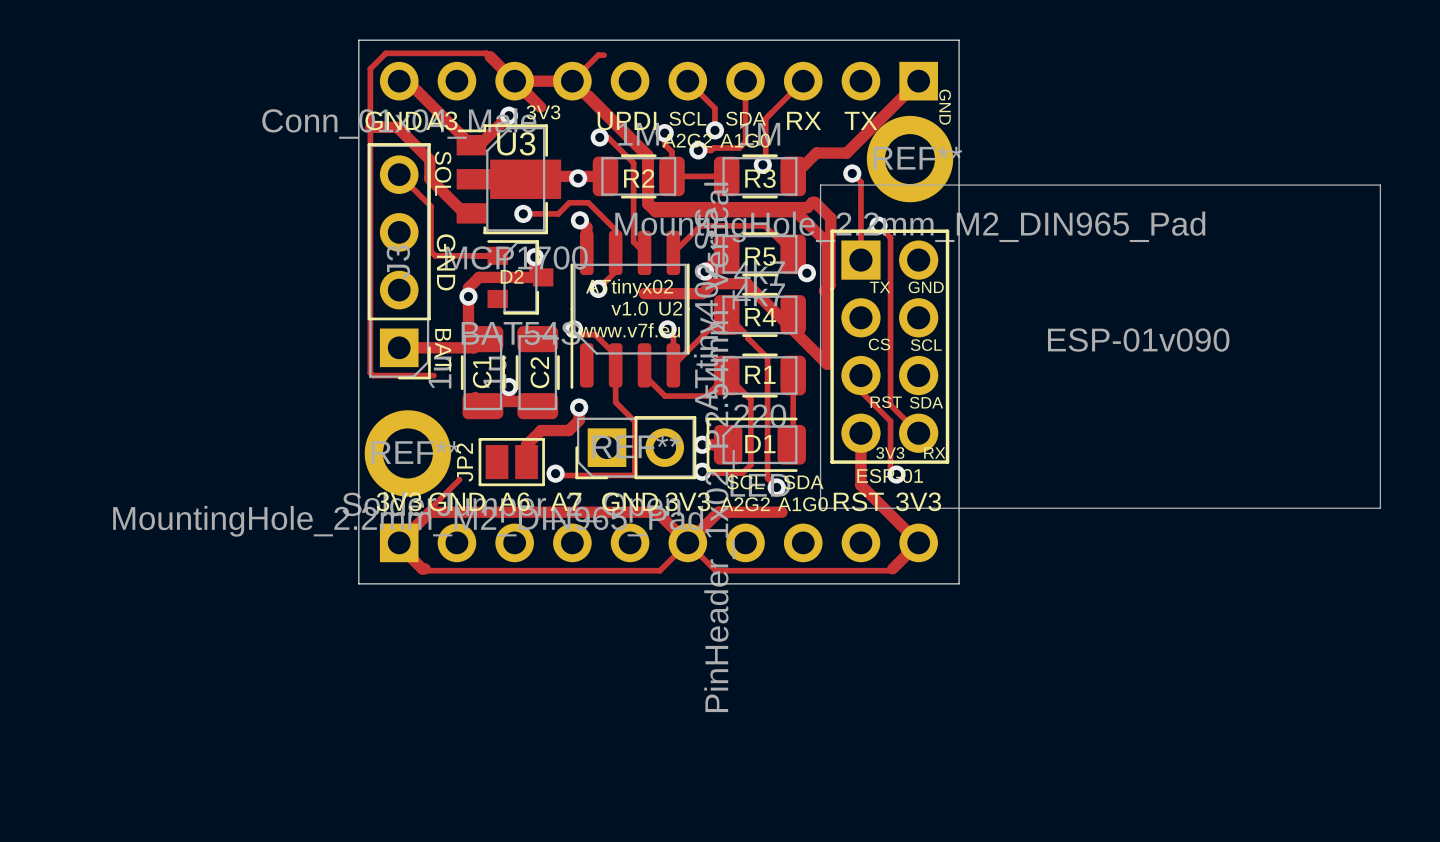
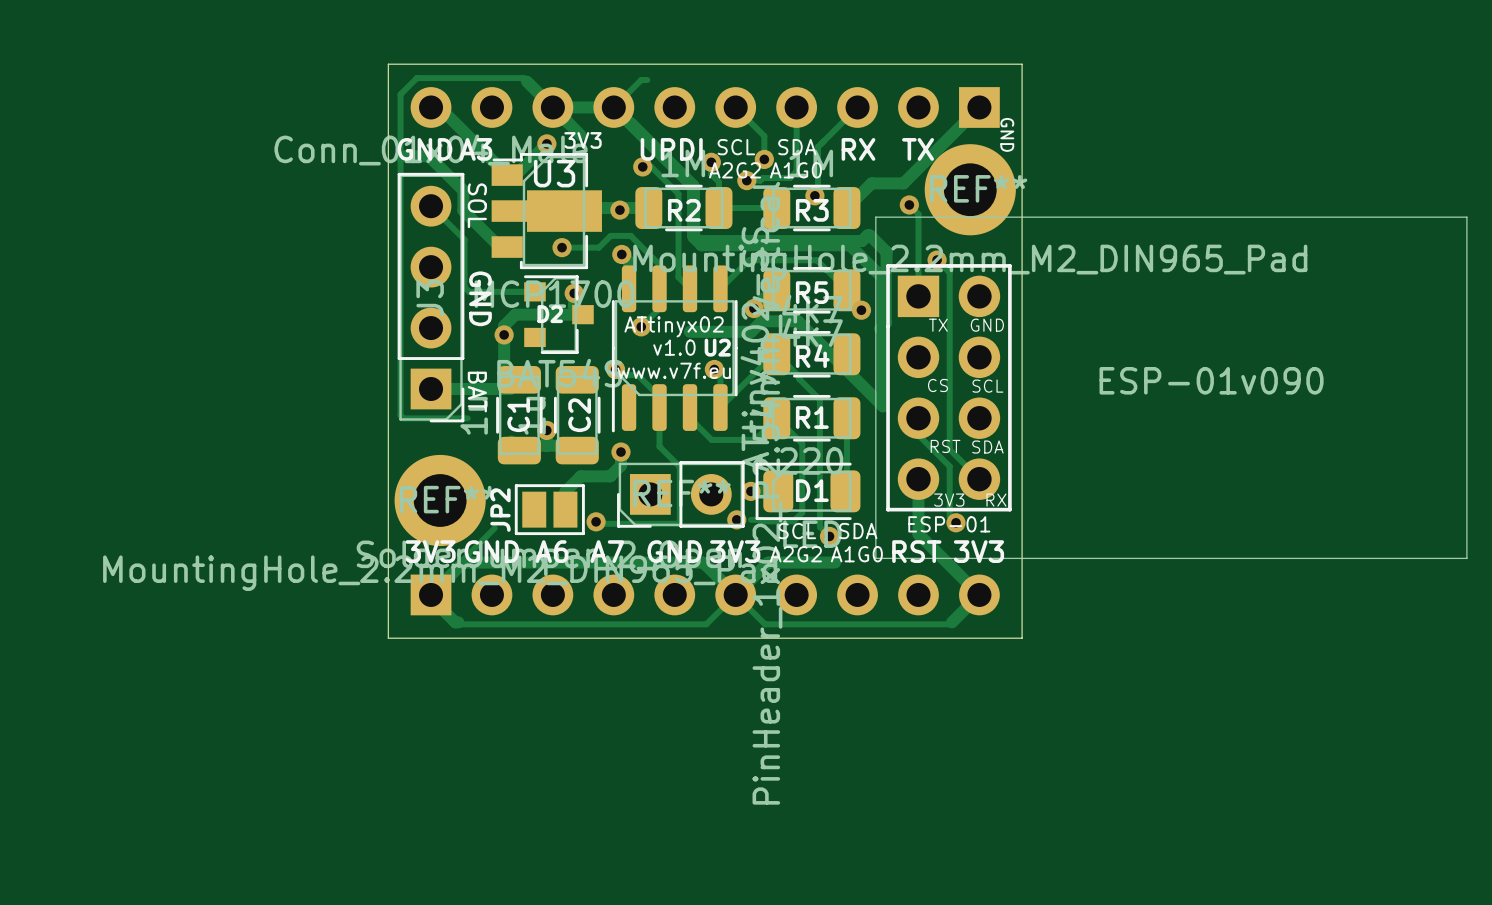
via position: (702, 471) -> (736, 519)

